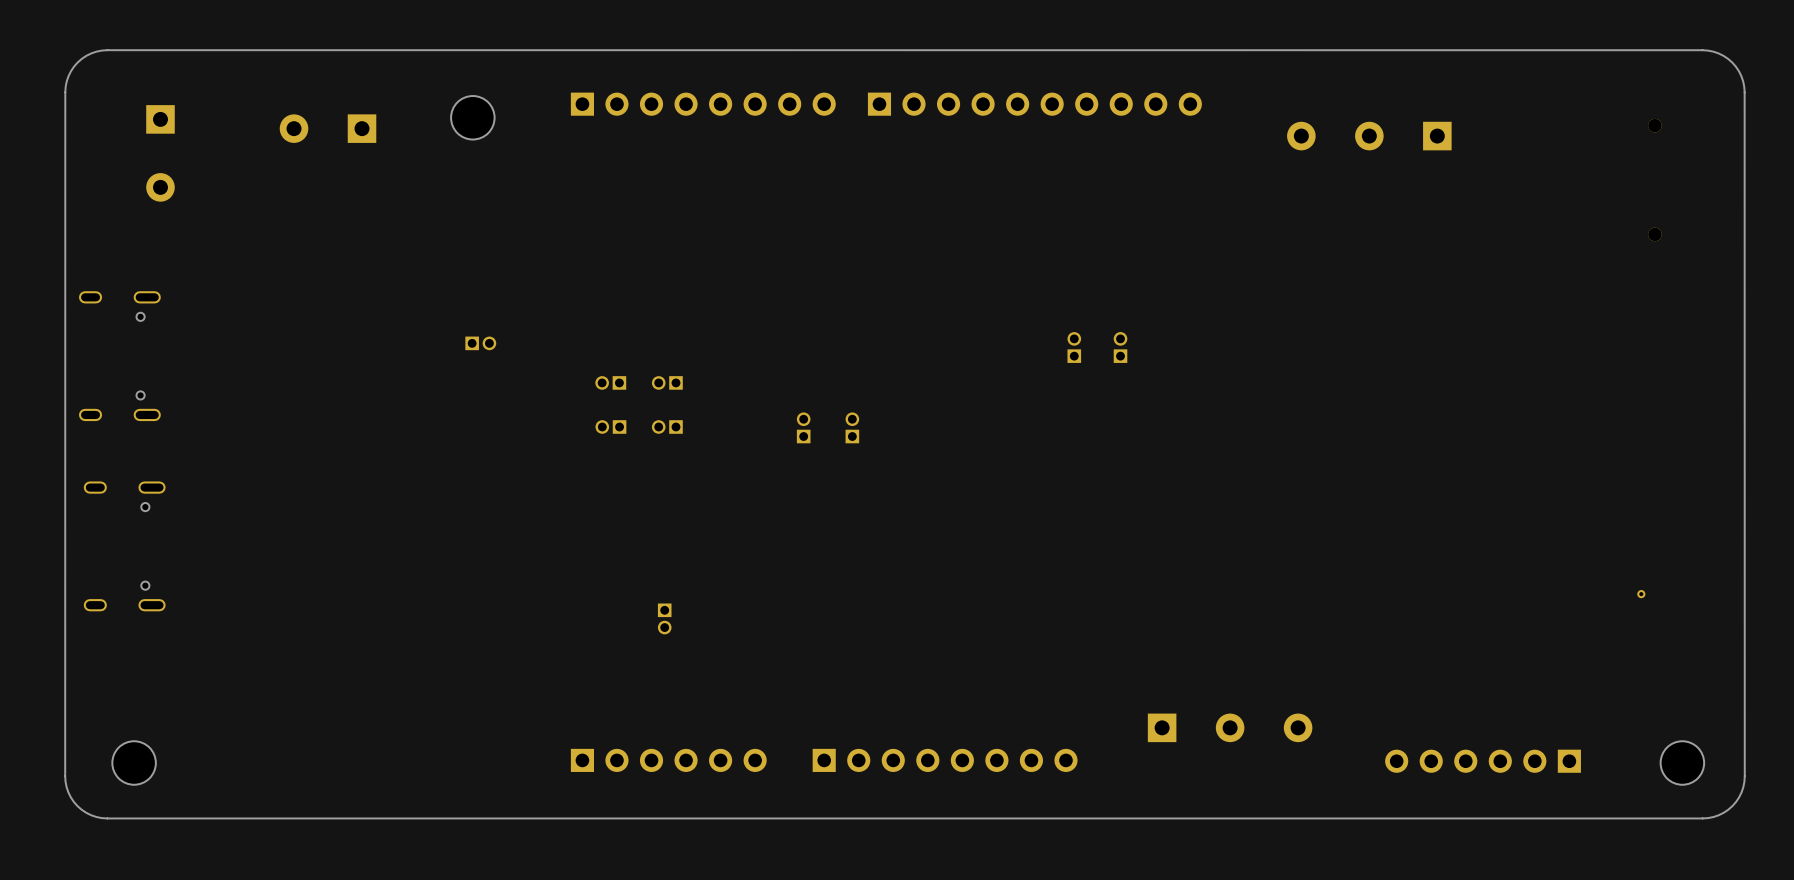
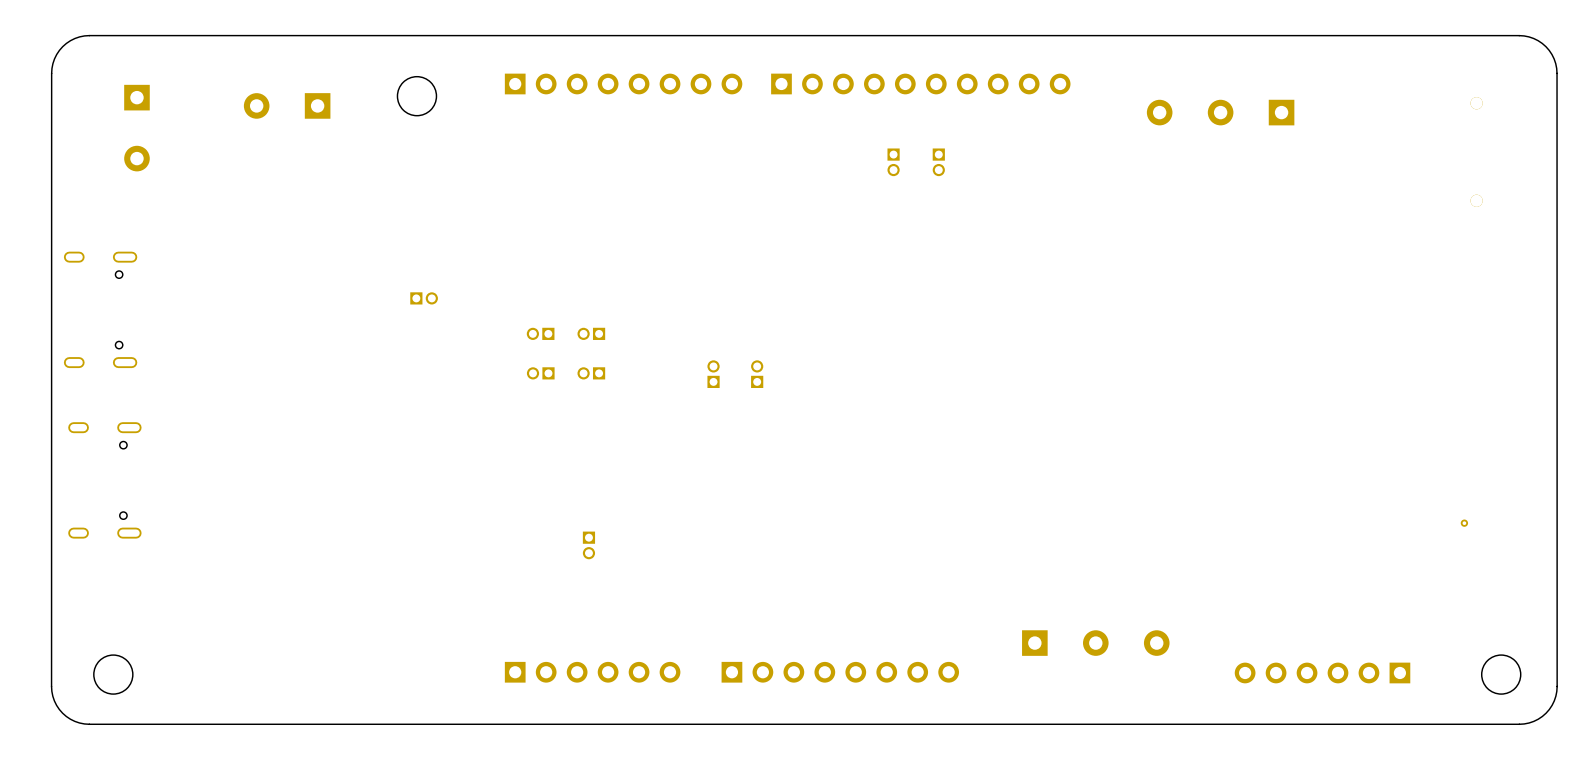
part: none -> (893, 162)
part: none -> (938, 162)
part: (1074, 347) -> none
part: (1120, 347) -> none

